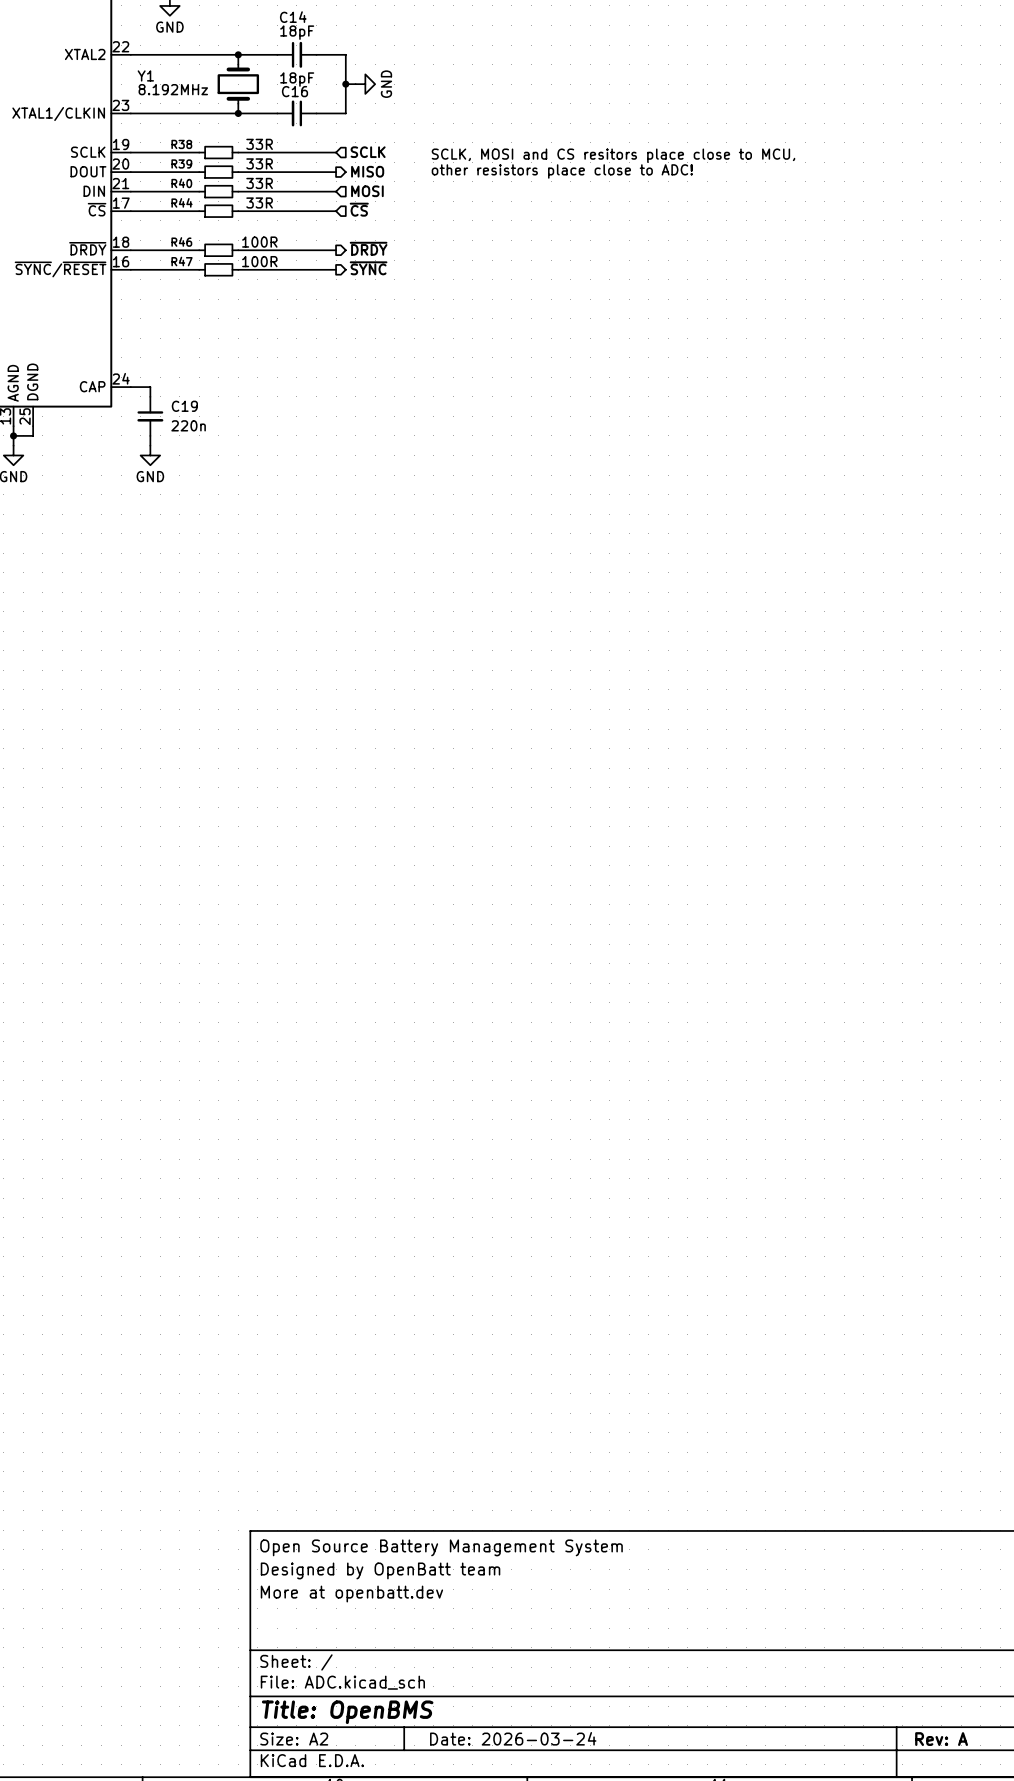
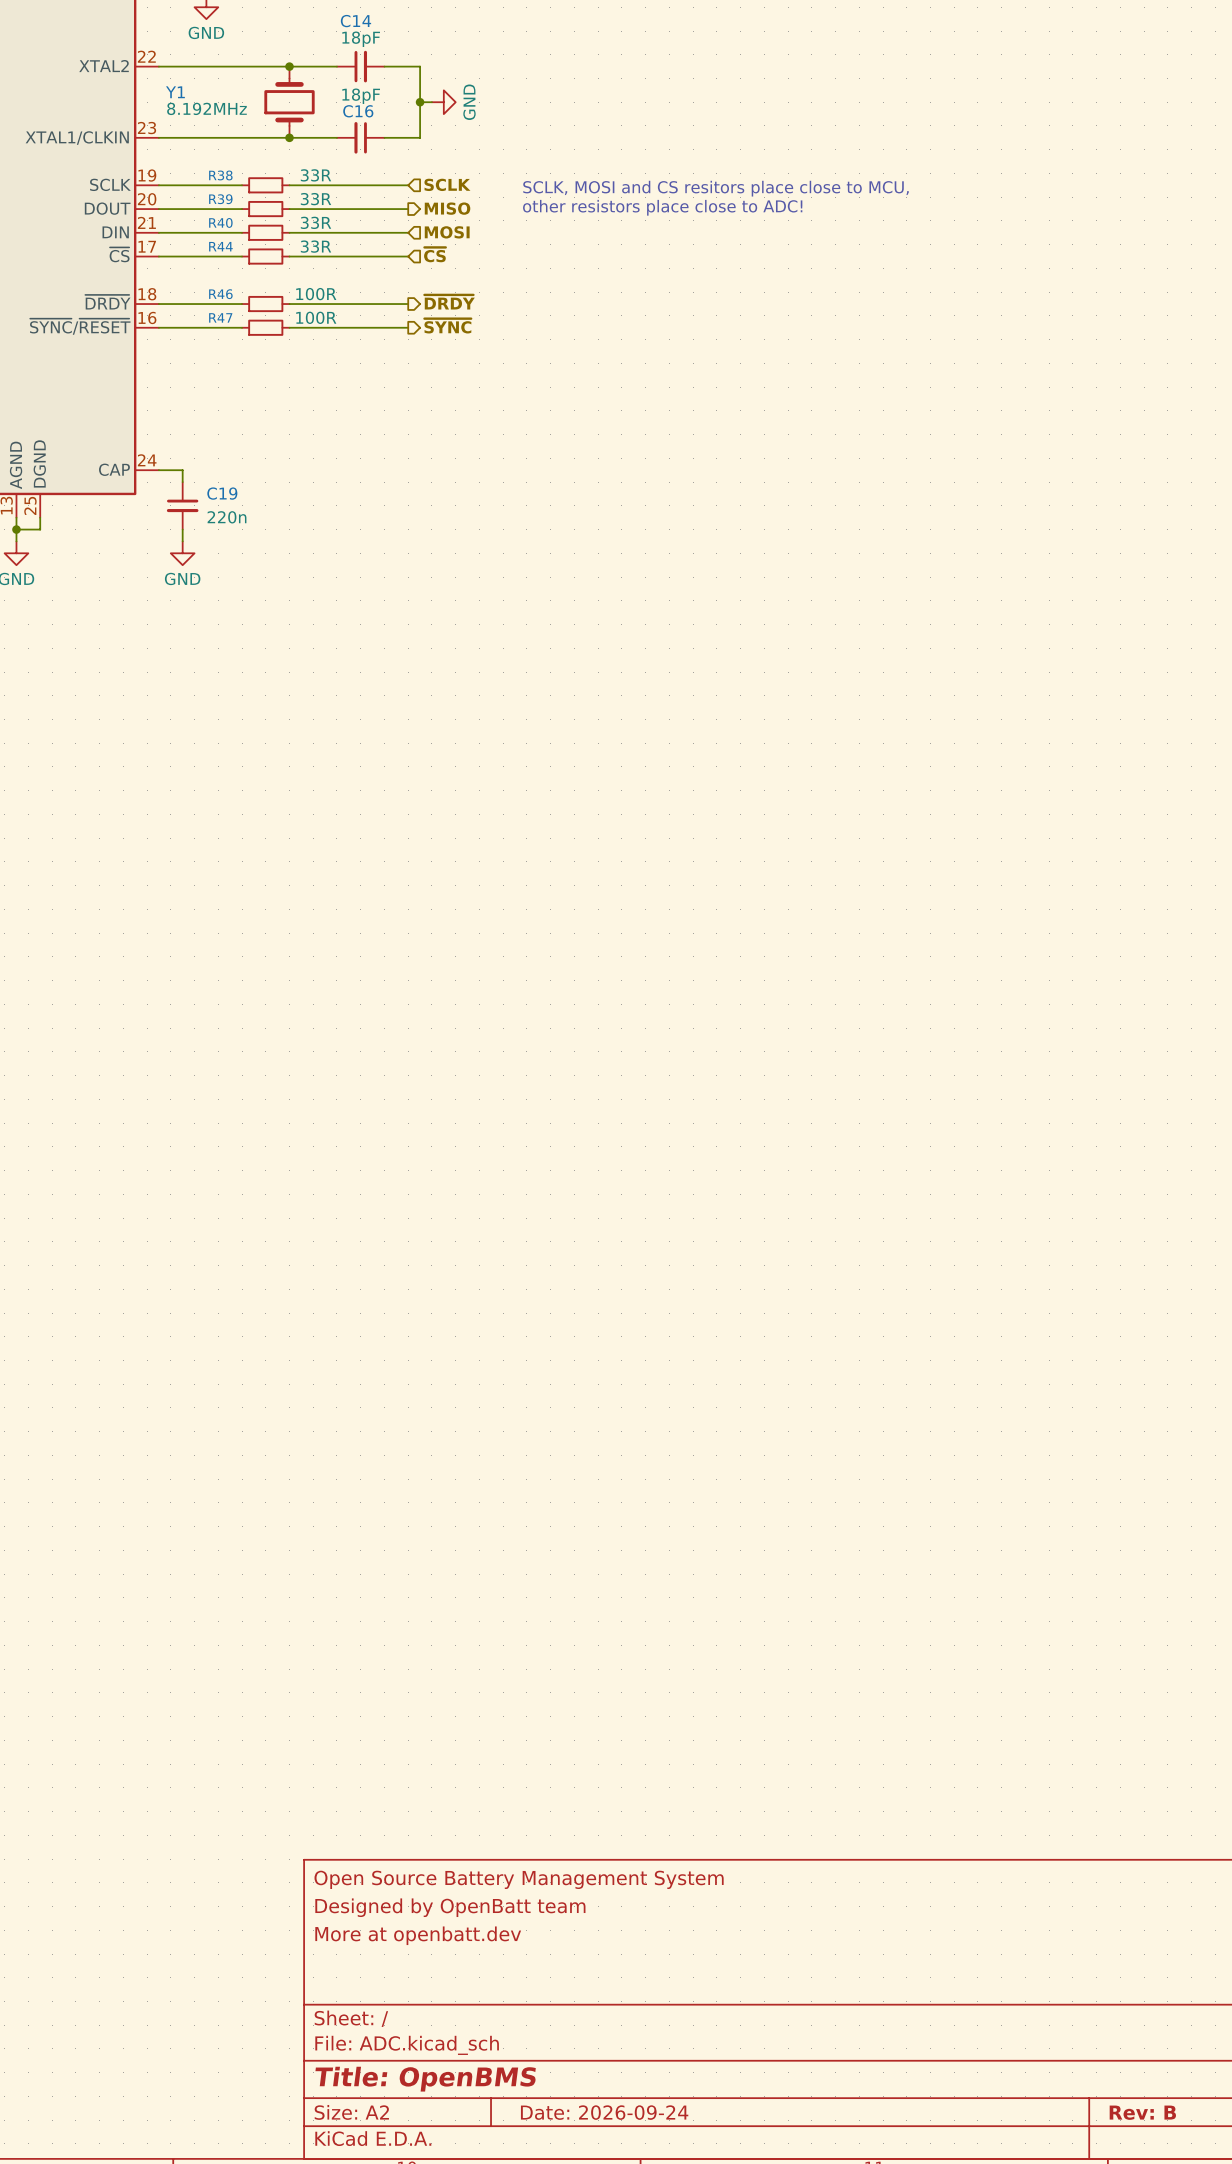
title block: Date: 2026-03-24 (513, 1738) -> Date: 2026-09-24 (604, 2112)
title block: Rev: A (941, 1739) -> Rev: B (1142, 2112)

